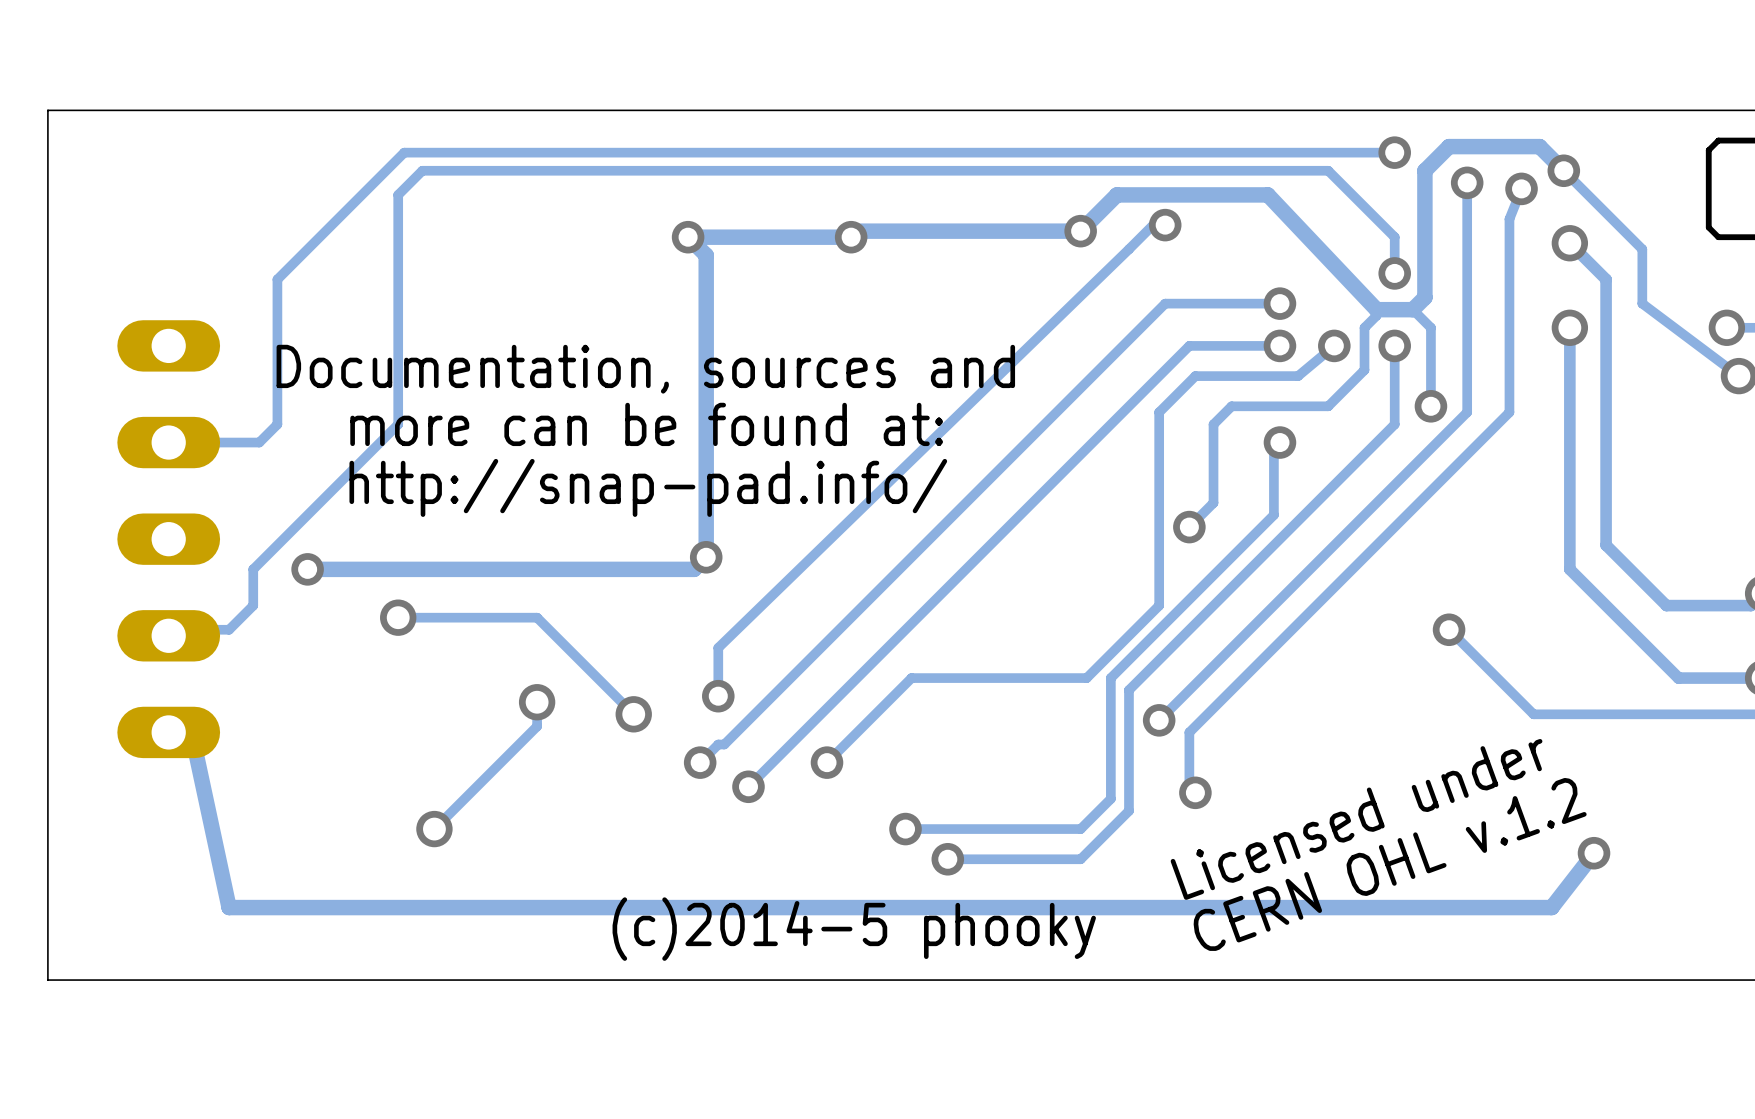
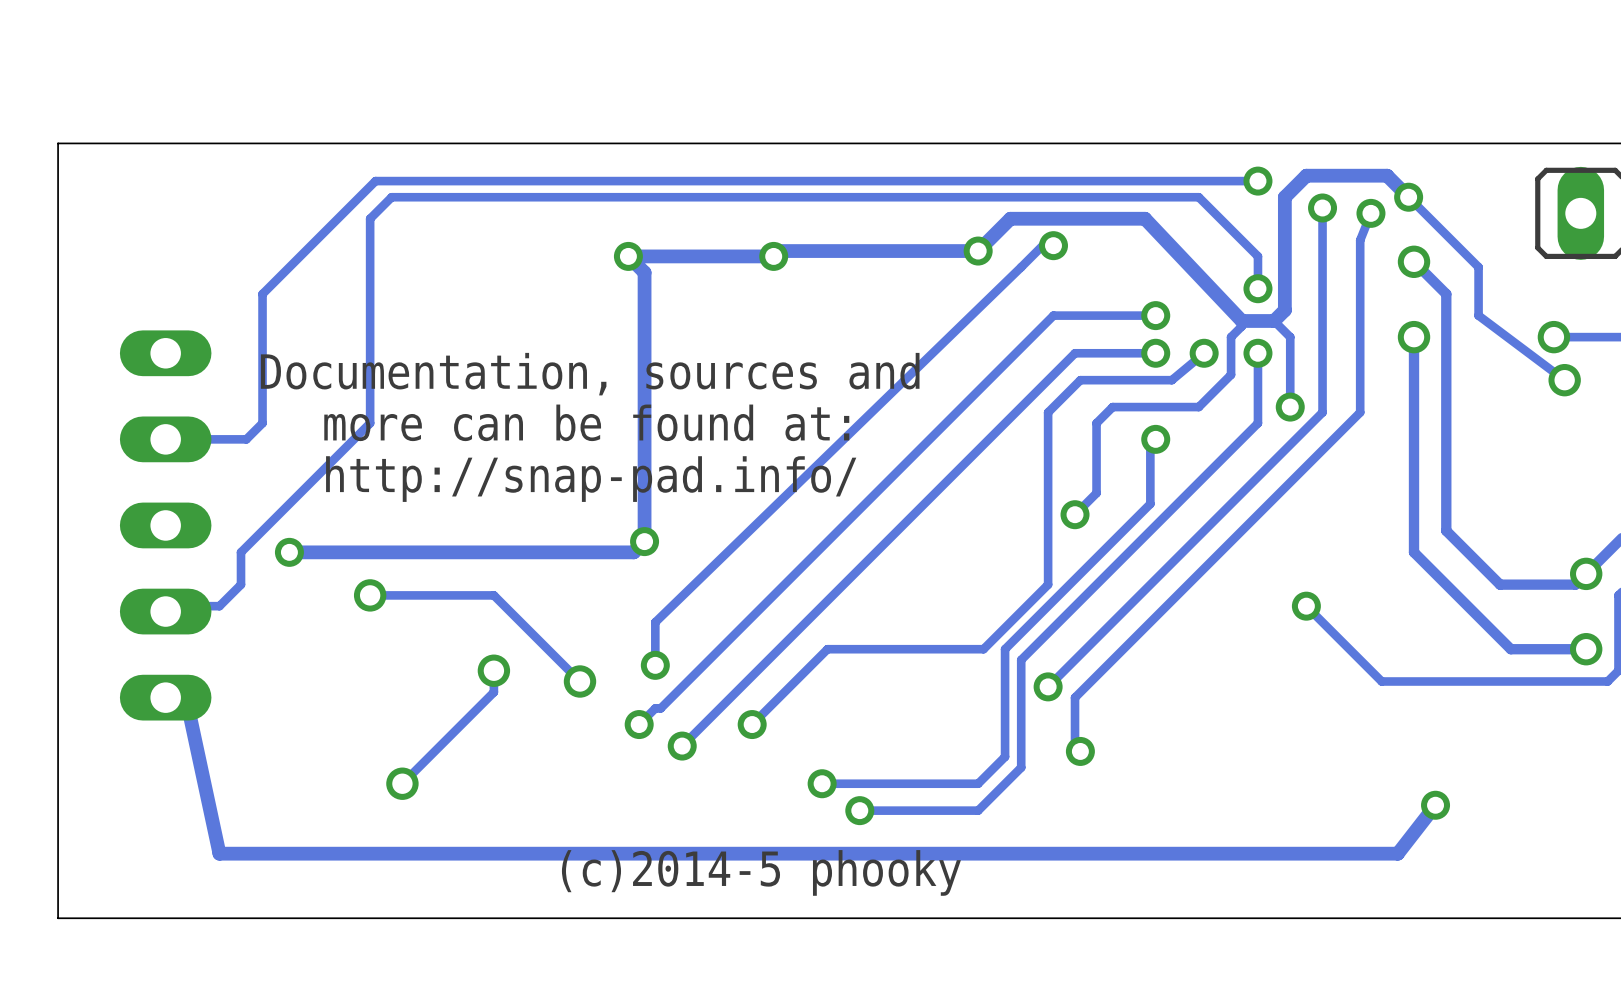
text: Licensed under (1356, 819) -> none
text: CERN OHL v.1.2 (1390, 864) -> none

